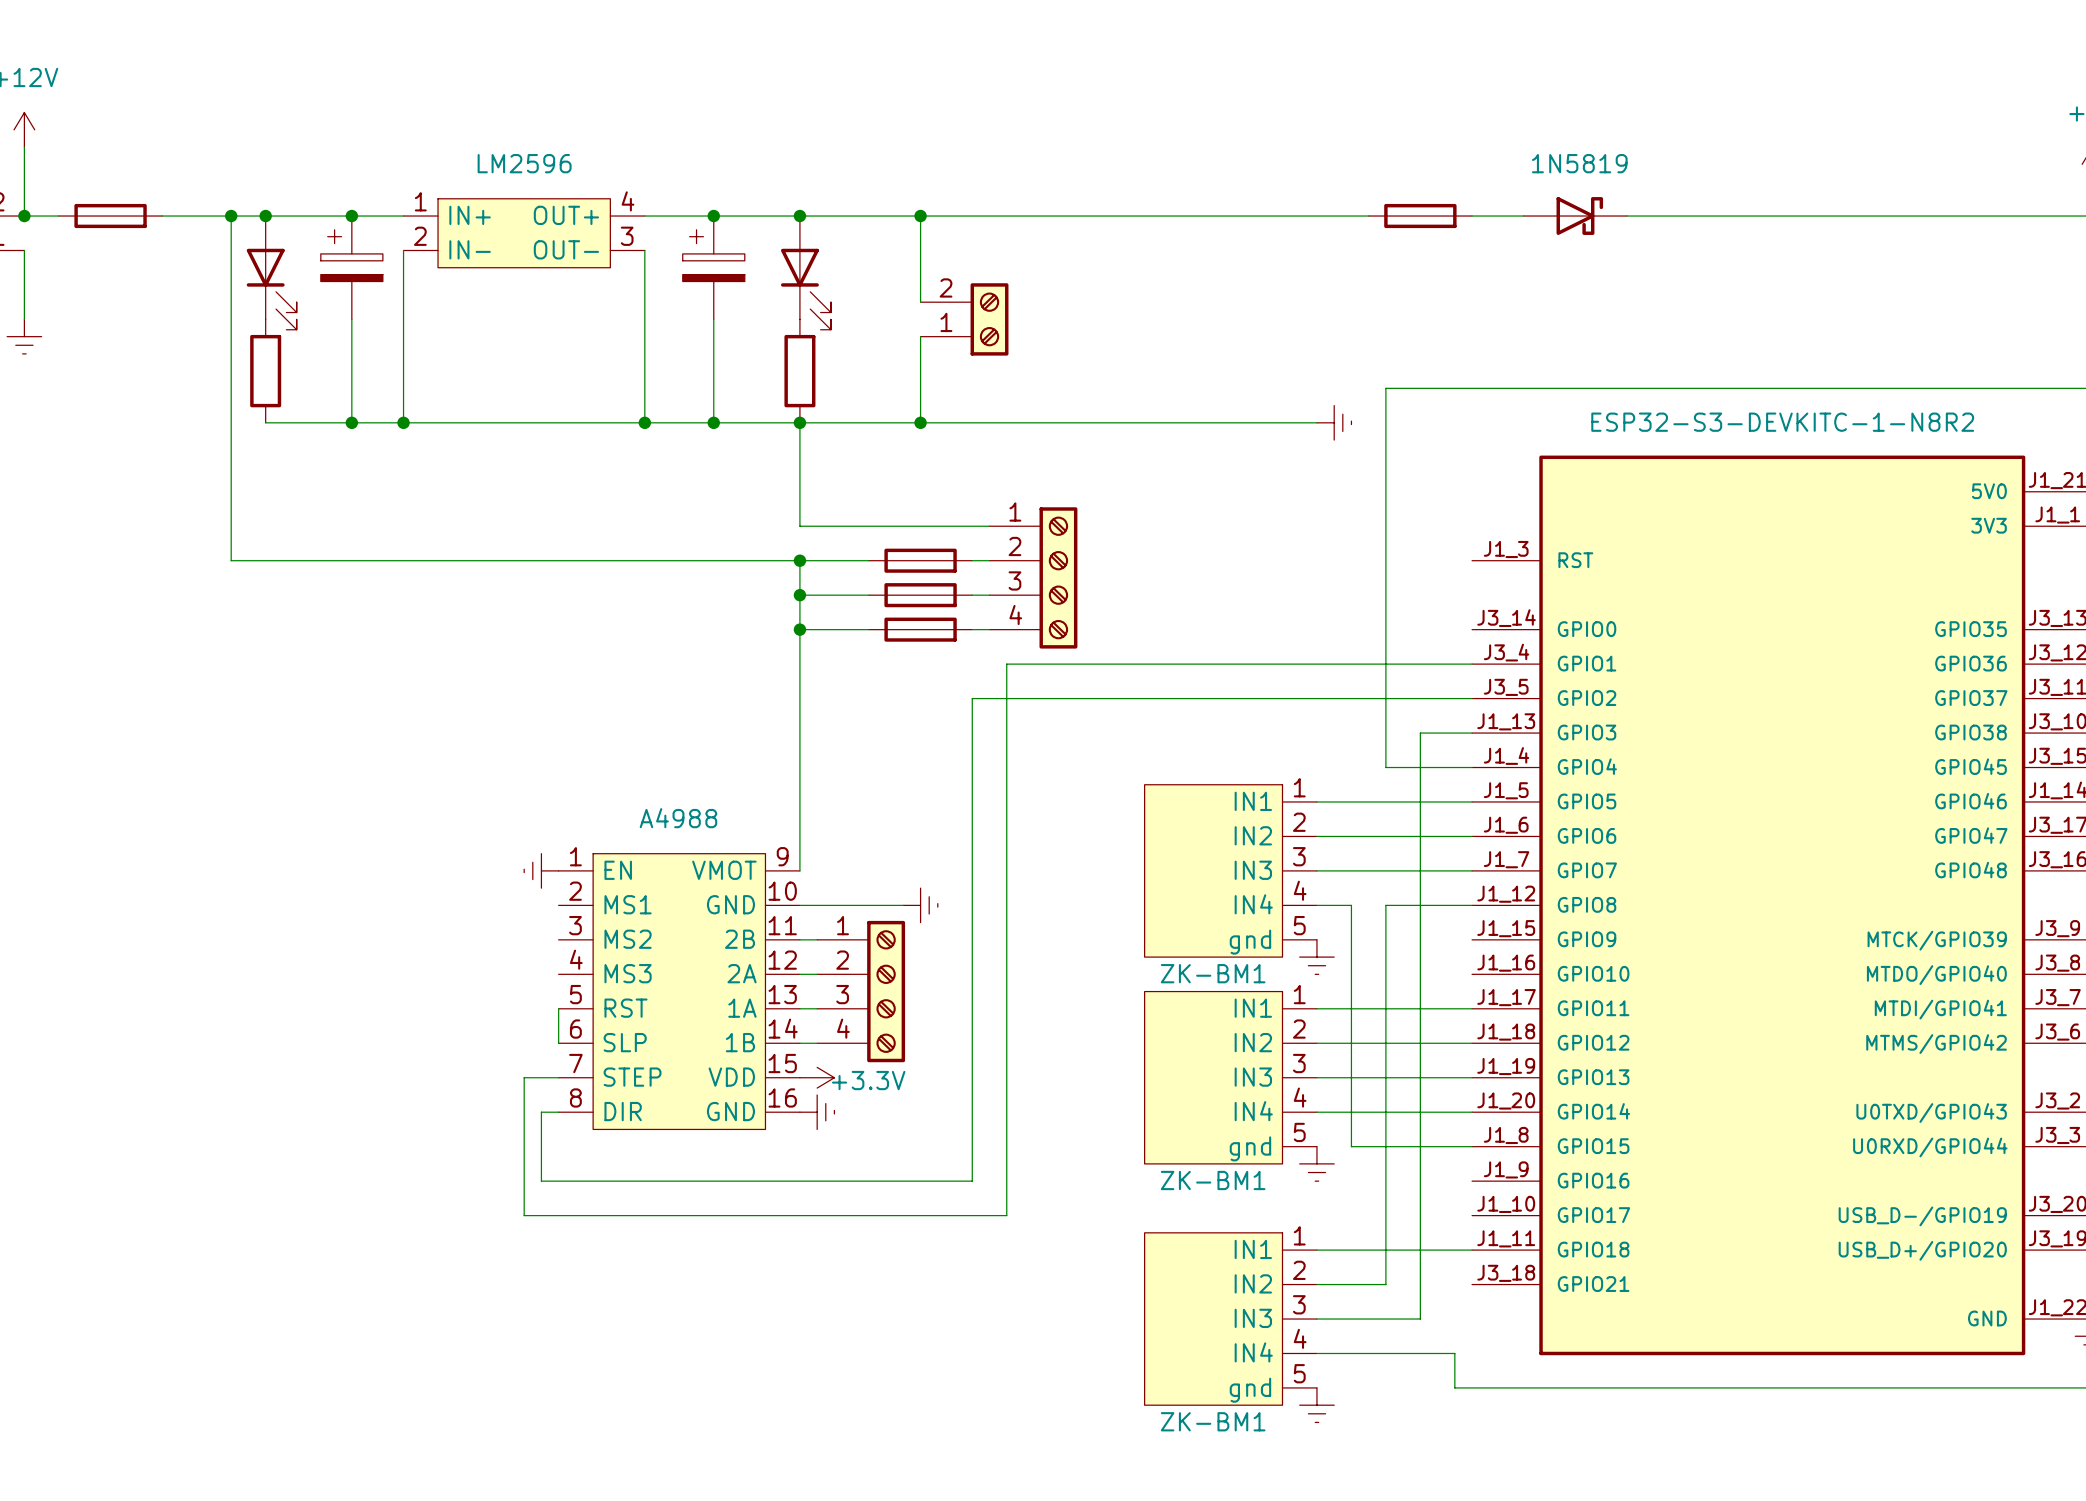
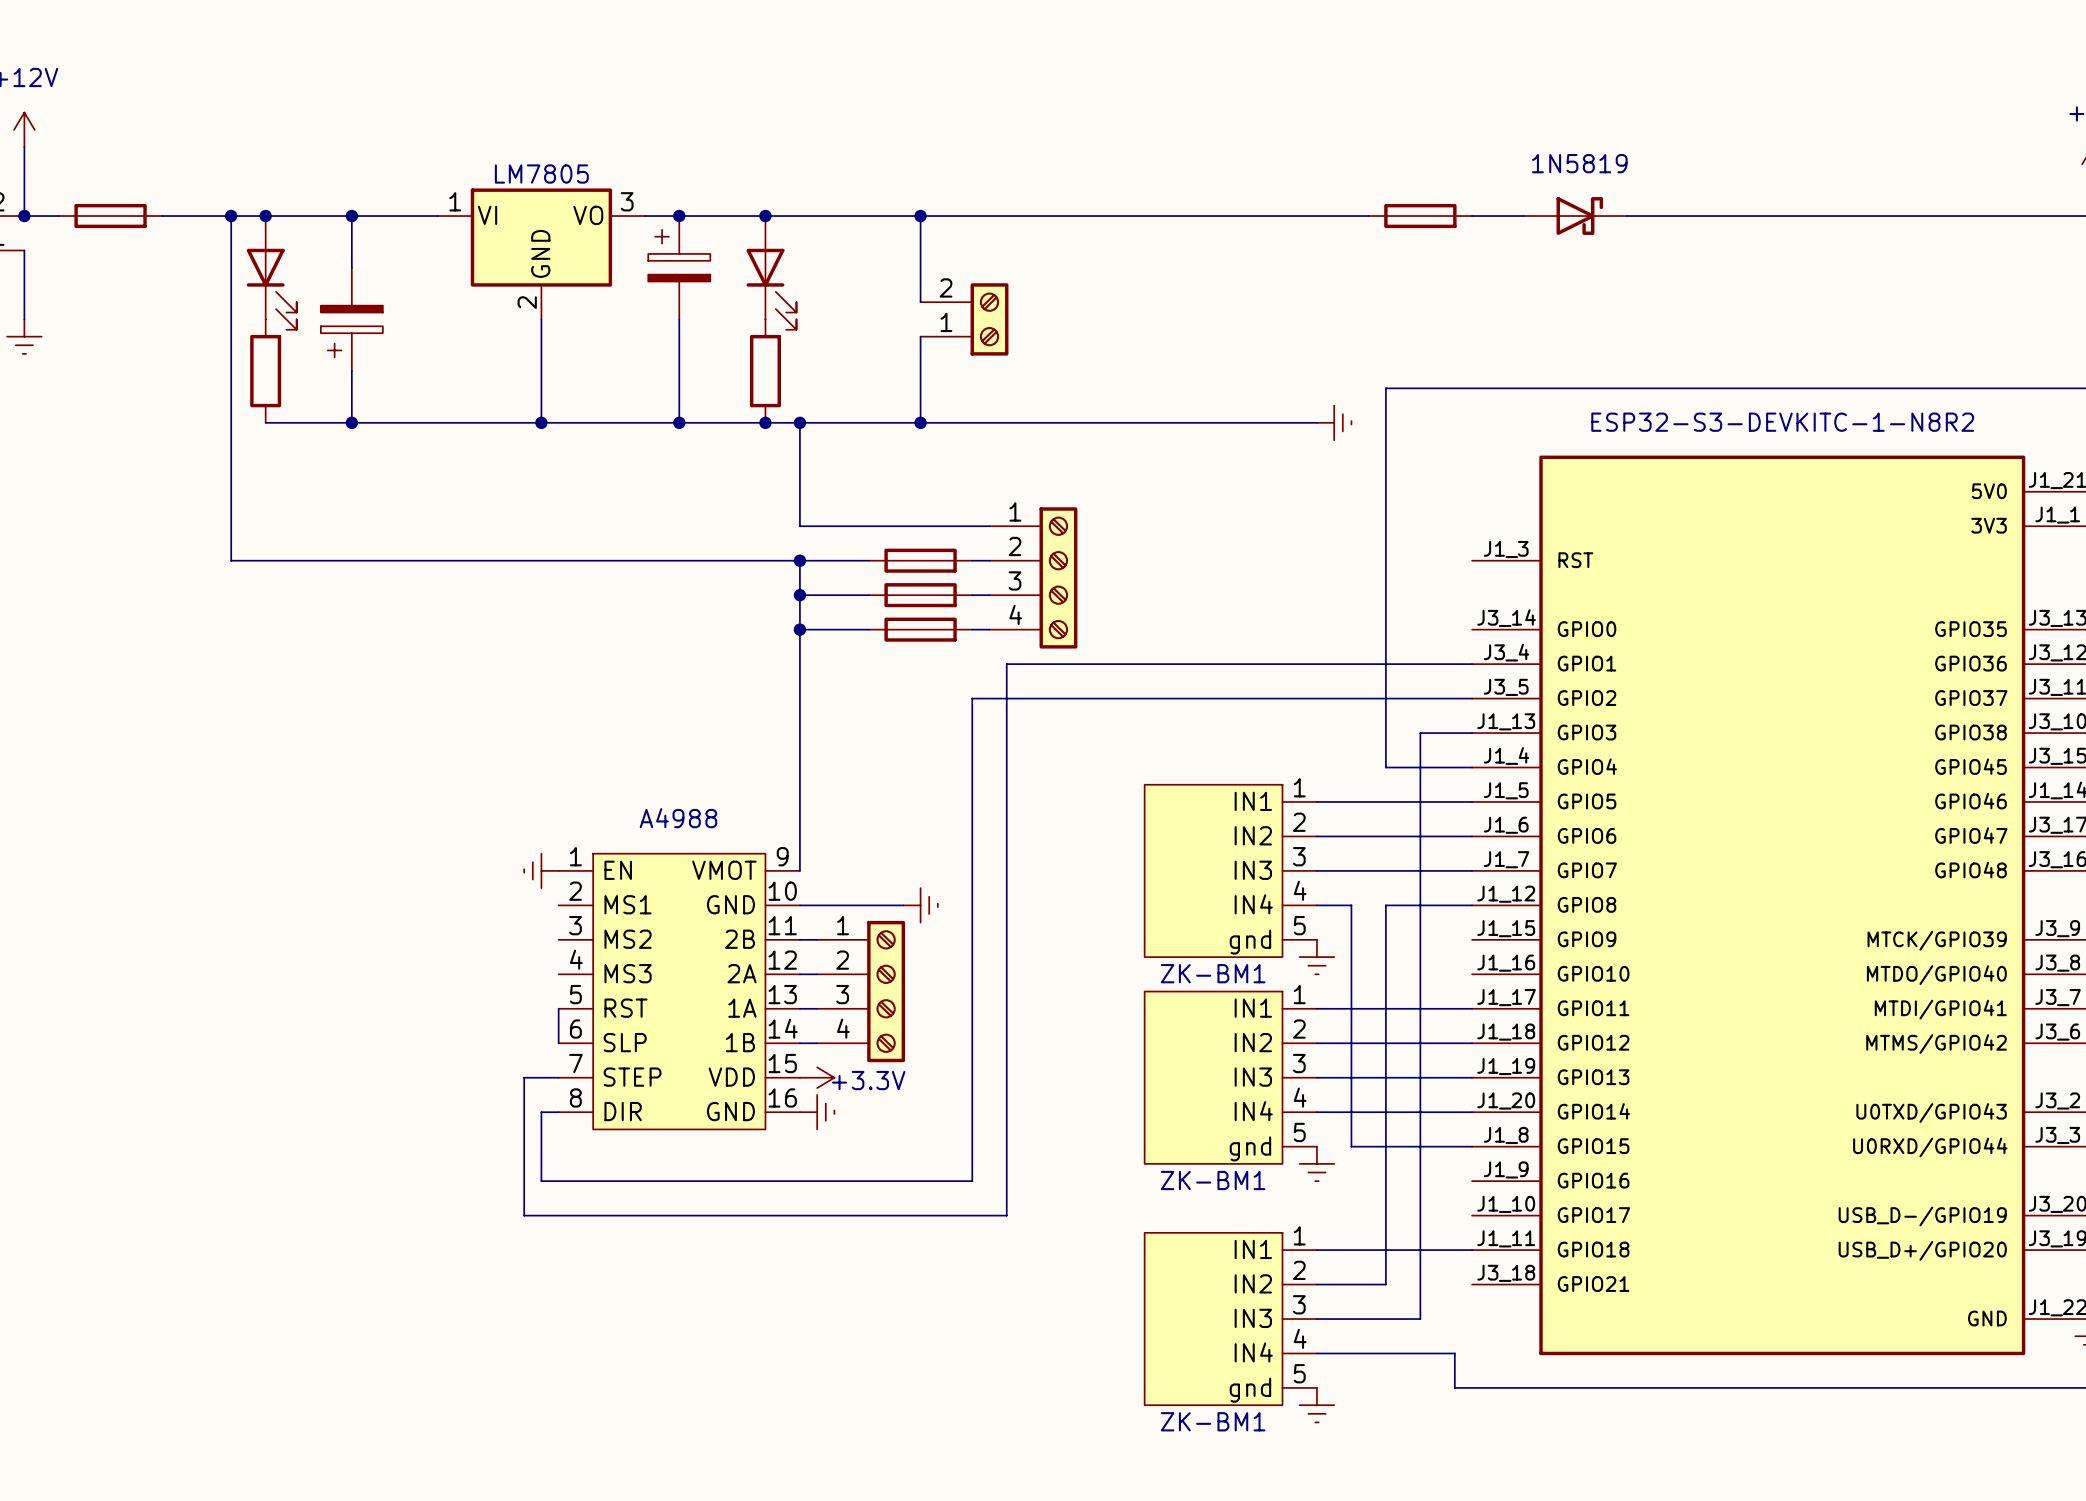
junction: none -> (679, 216)
junction: (713, 216) -> none
junction: none -> (765, 216)
junction: (799, 216) -> none
part: LM2596 (524, 233) -> none
wire: (403, 250) (403, 422) -> none
wire: (644, 250) (644, 422) -> none
part: none -> LM7805 (541, 253)
part: (351, 267) -> none
part position: (713, 267) -> (679, 267)
part position: (805, 272) -> (771, 272)
part: none -> (351, 319)
wire: none -> (541, 319) (541, 422)
wire: (713, 319) (713, 422) -> (679, 319) (679, 422)
part position: (799, 371) -> (765, 371)
junction: (403, 422) -> none
junction: none -> (541, 422)
junction: (644, 422) -> none
junction: none -> (679, 422)
junction: (713, 422) -> none
junction: none -> (765, 422)

